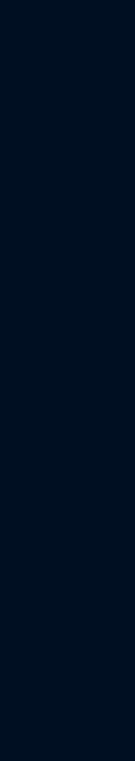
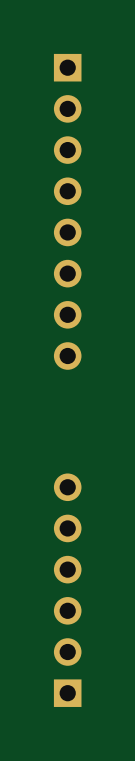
part: none -> (67, 211)
part: none -> (67, 590)

